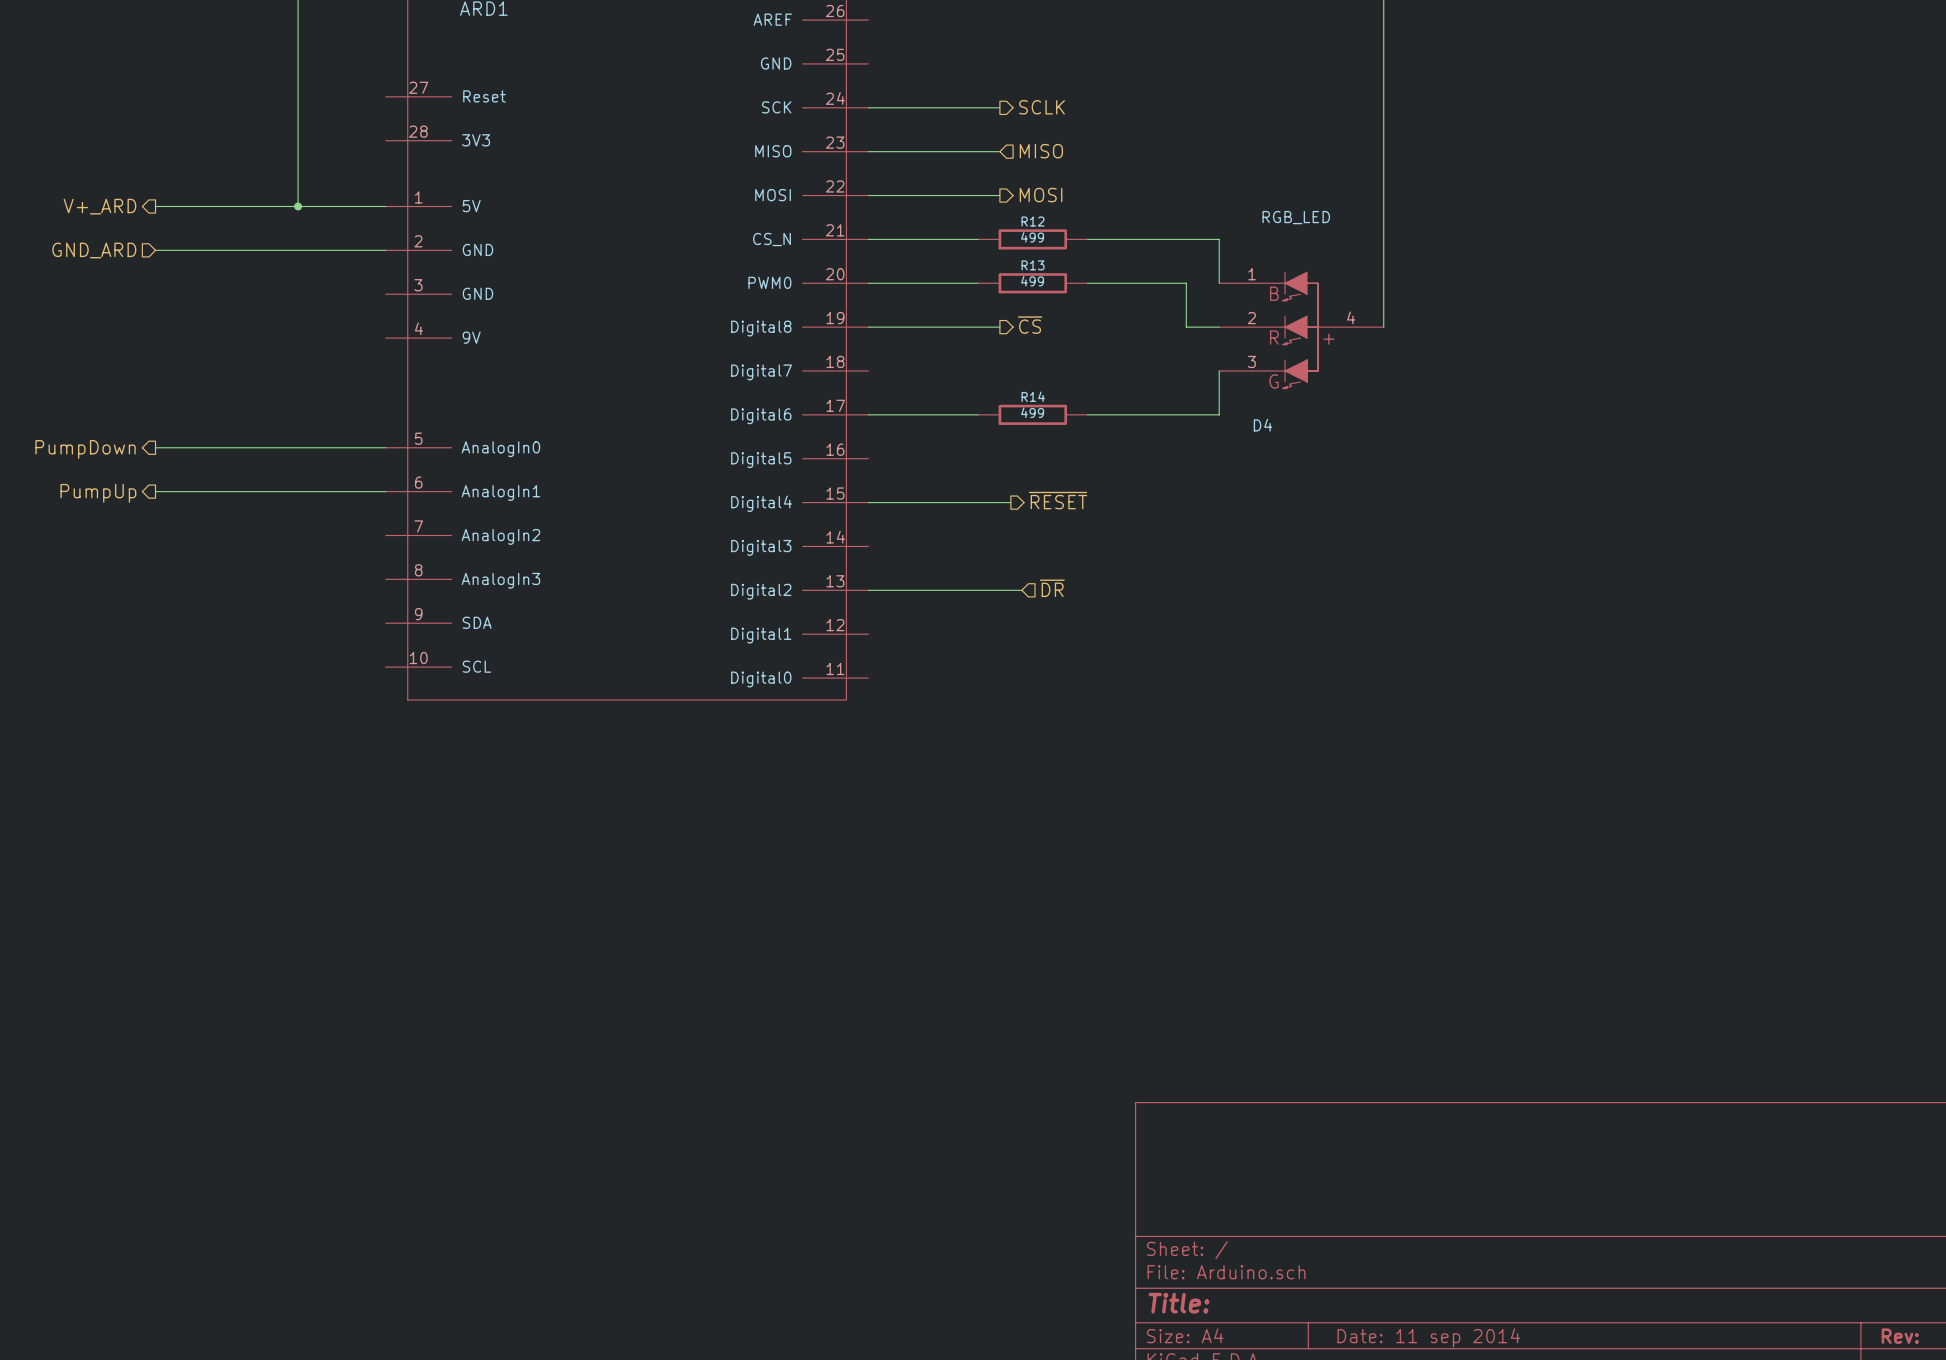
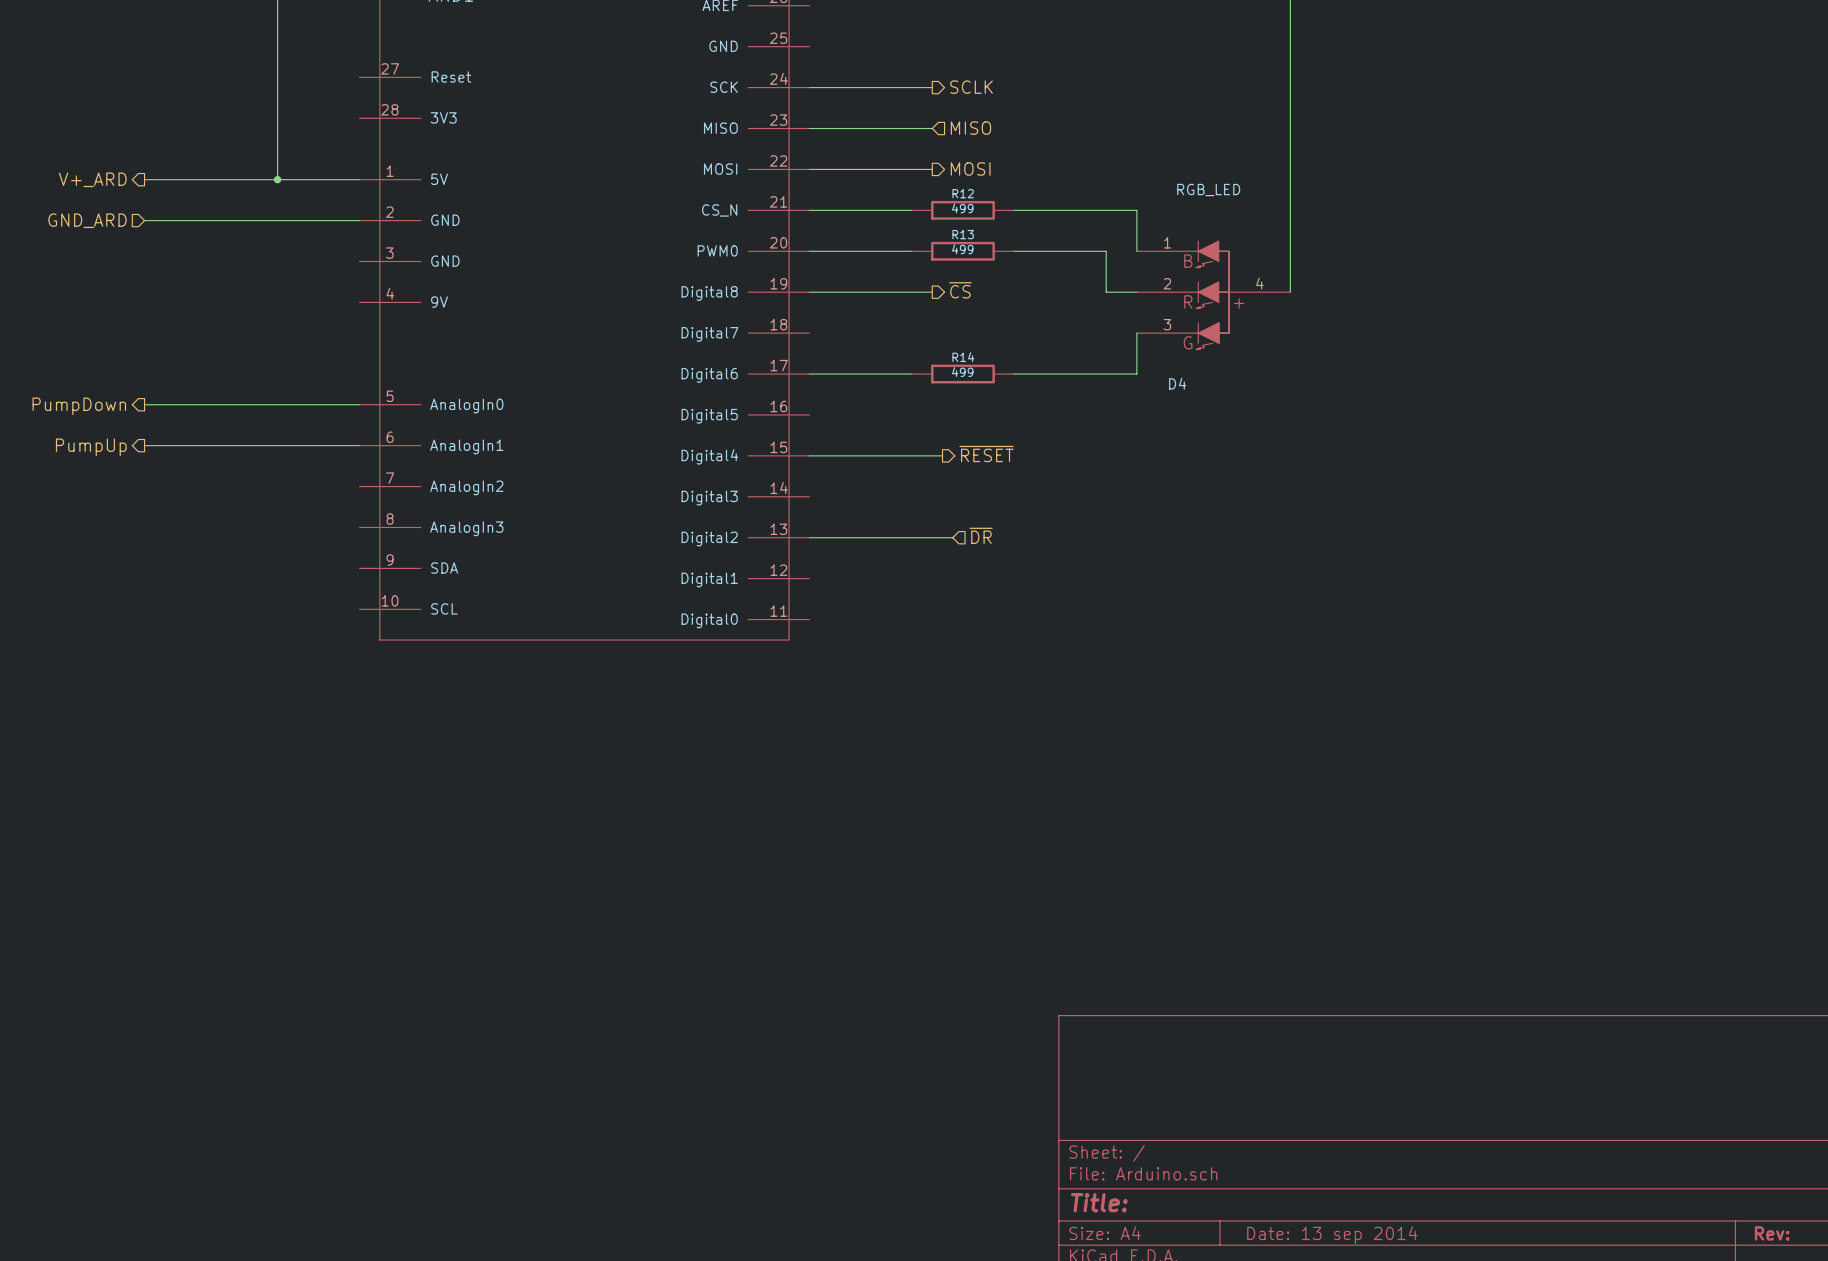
title block: Date: 11 sep 2014 (1428, 1337) -> Date: 13 sep 2014 (1332, 1235)

